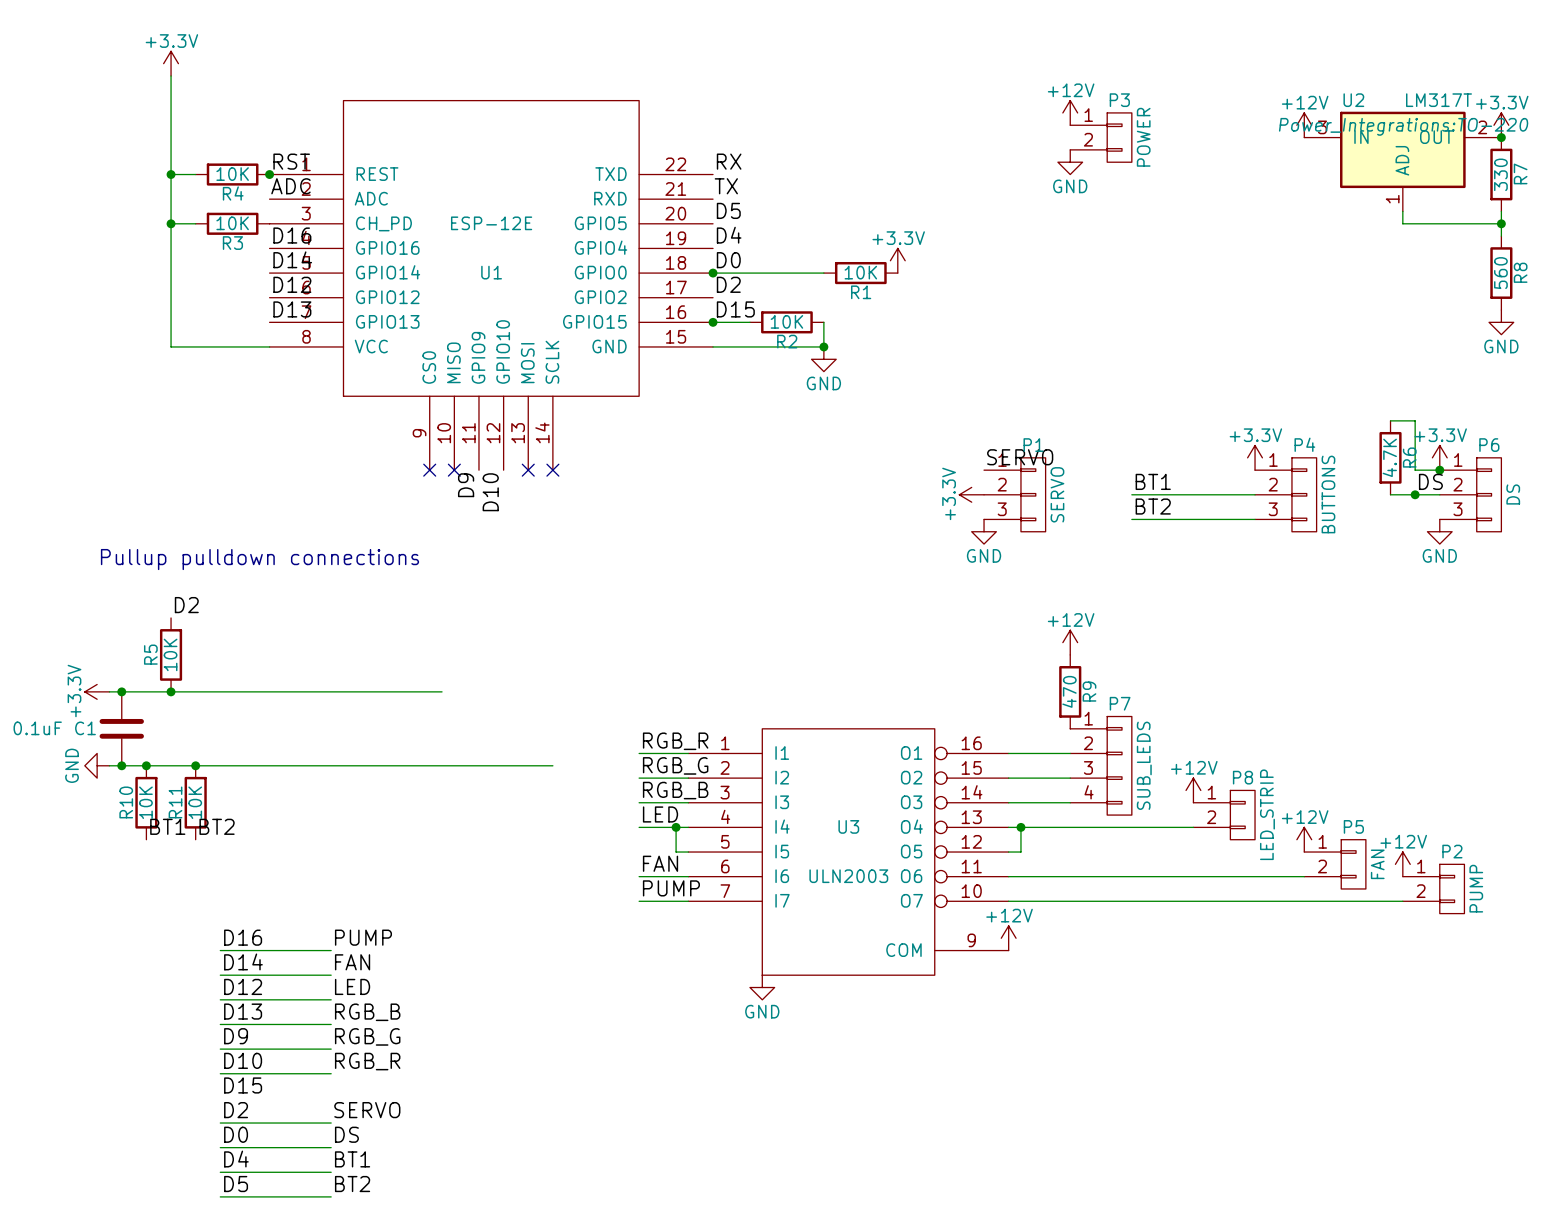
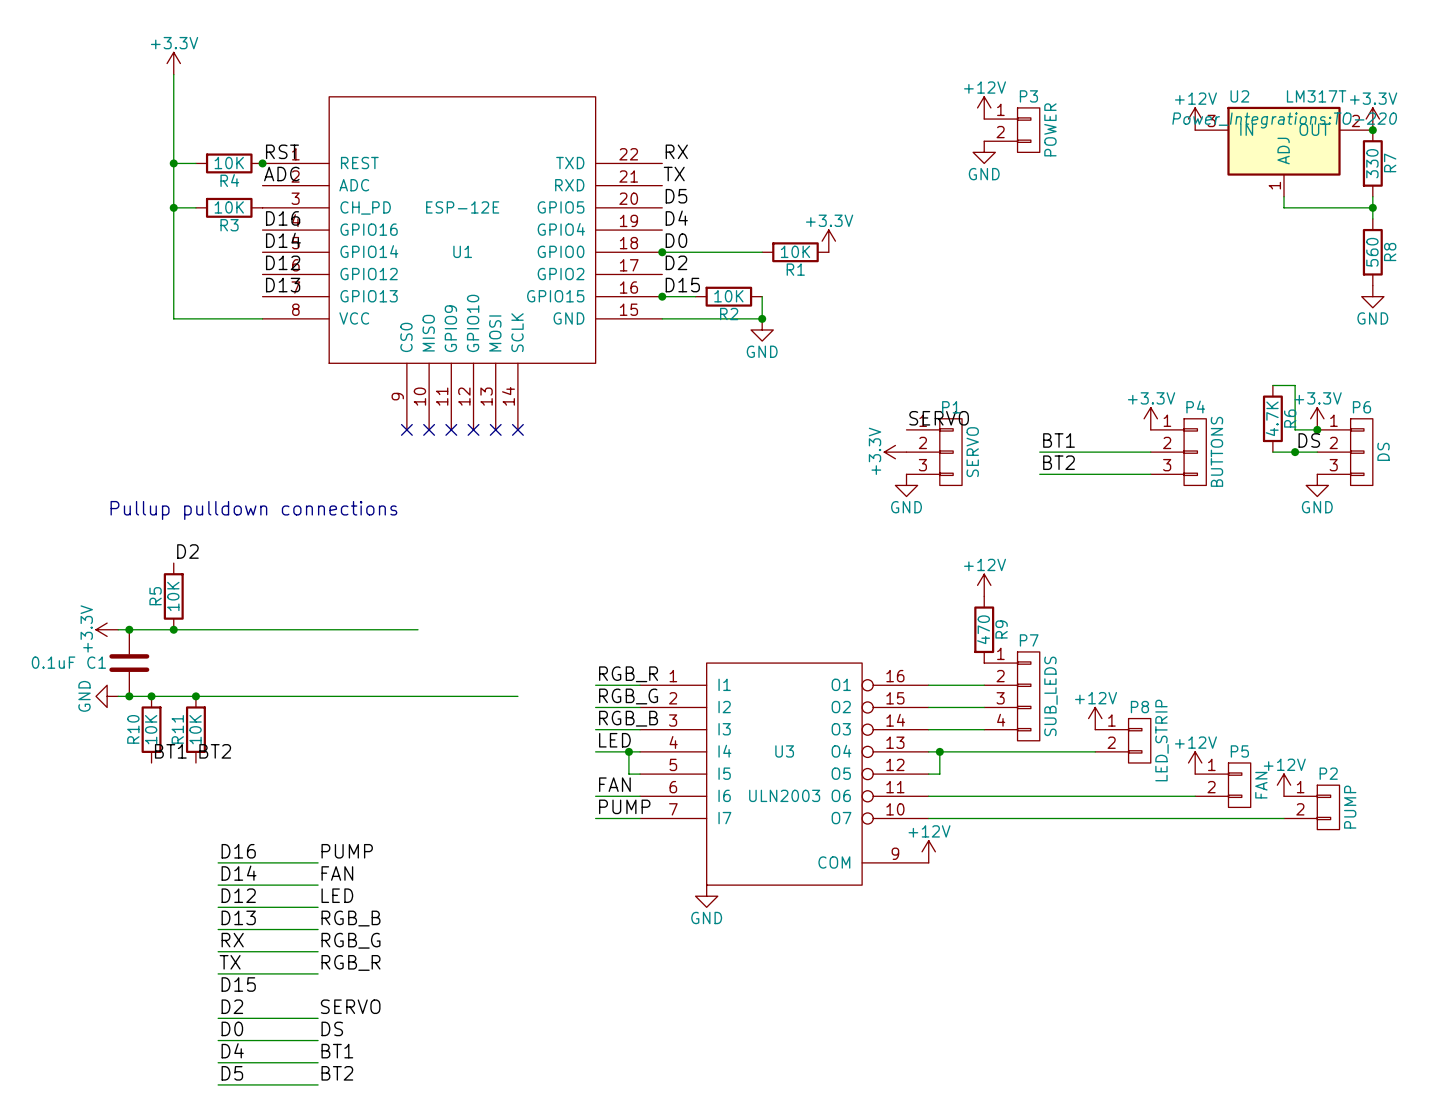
no-connect mark: none -> (451, 429)
no-connect mark: none -> (473, 429)
label: D9 (466, 485) -> none
label: D10 (490, 492) -> none
label: D9 (236, 1036) -> RX (232, 940)
label: D10 (243, 1060) -> TX (230, 962)

